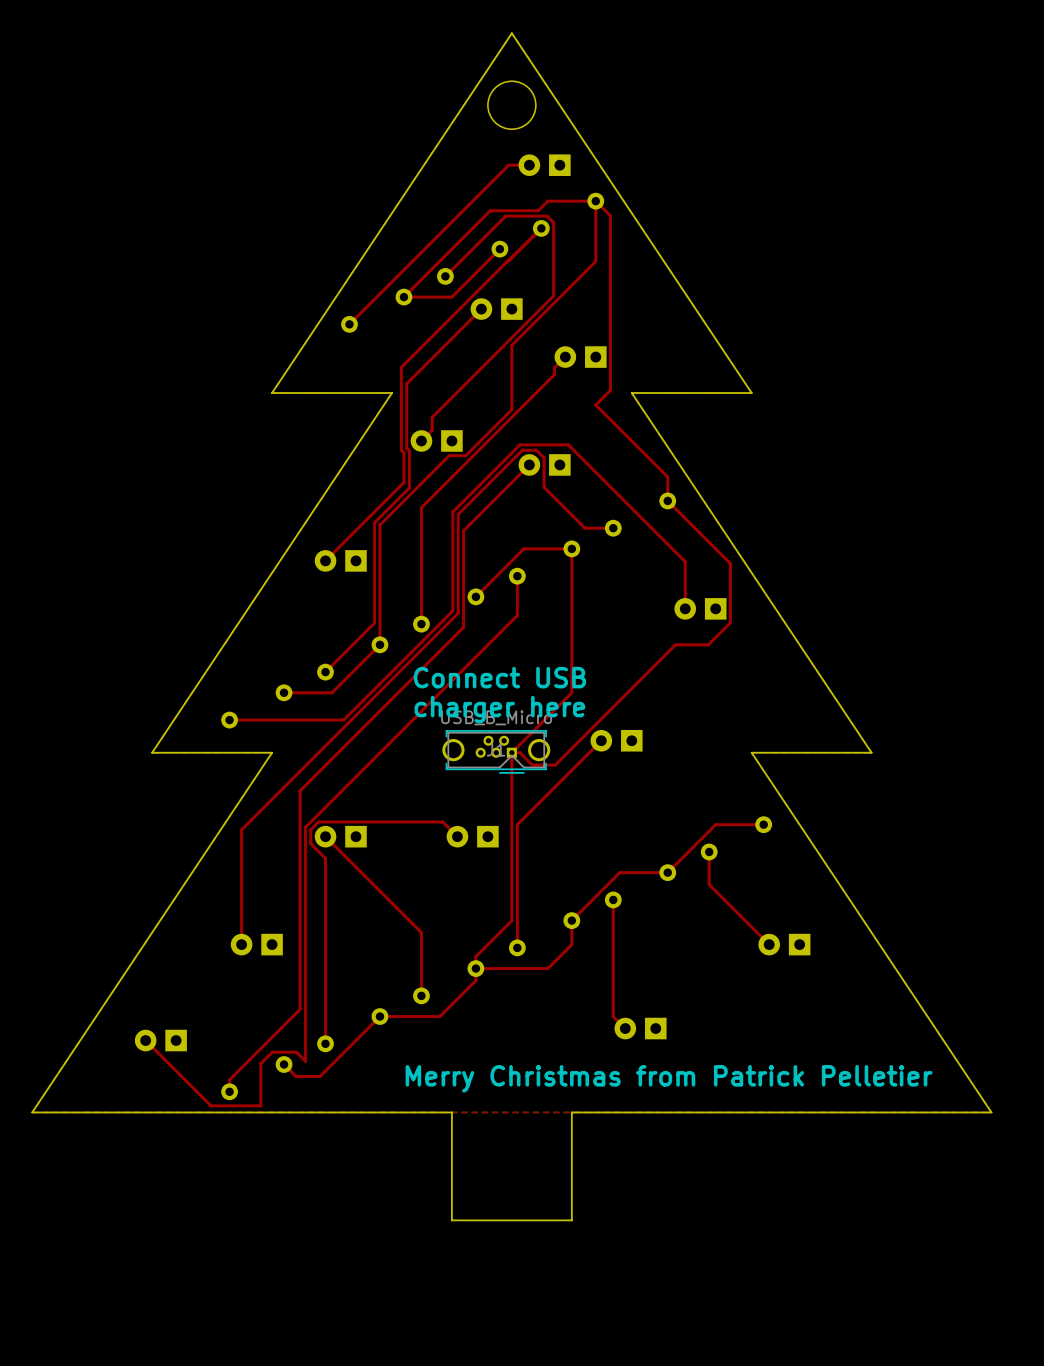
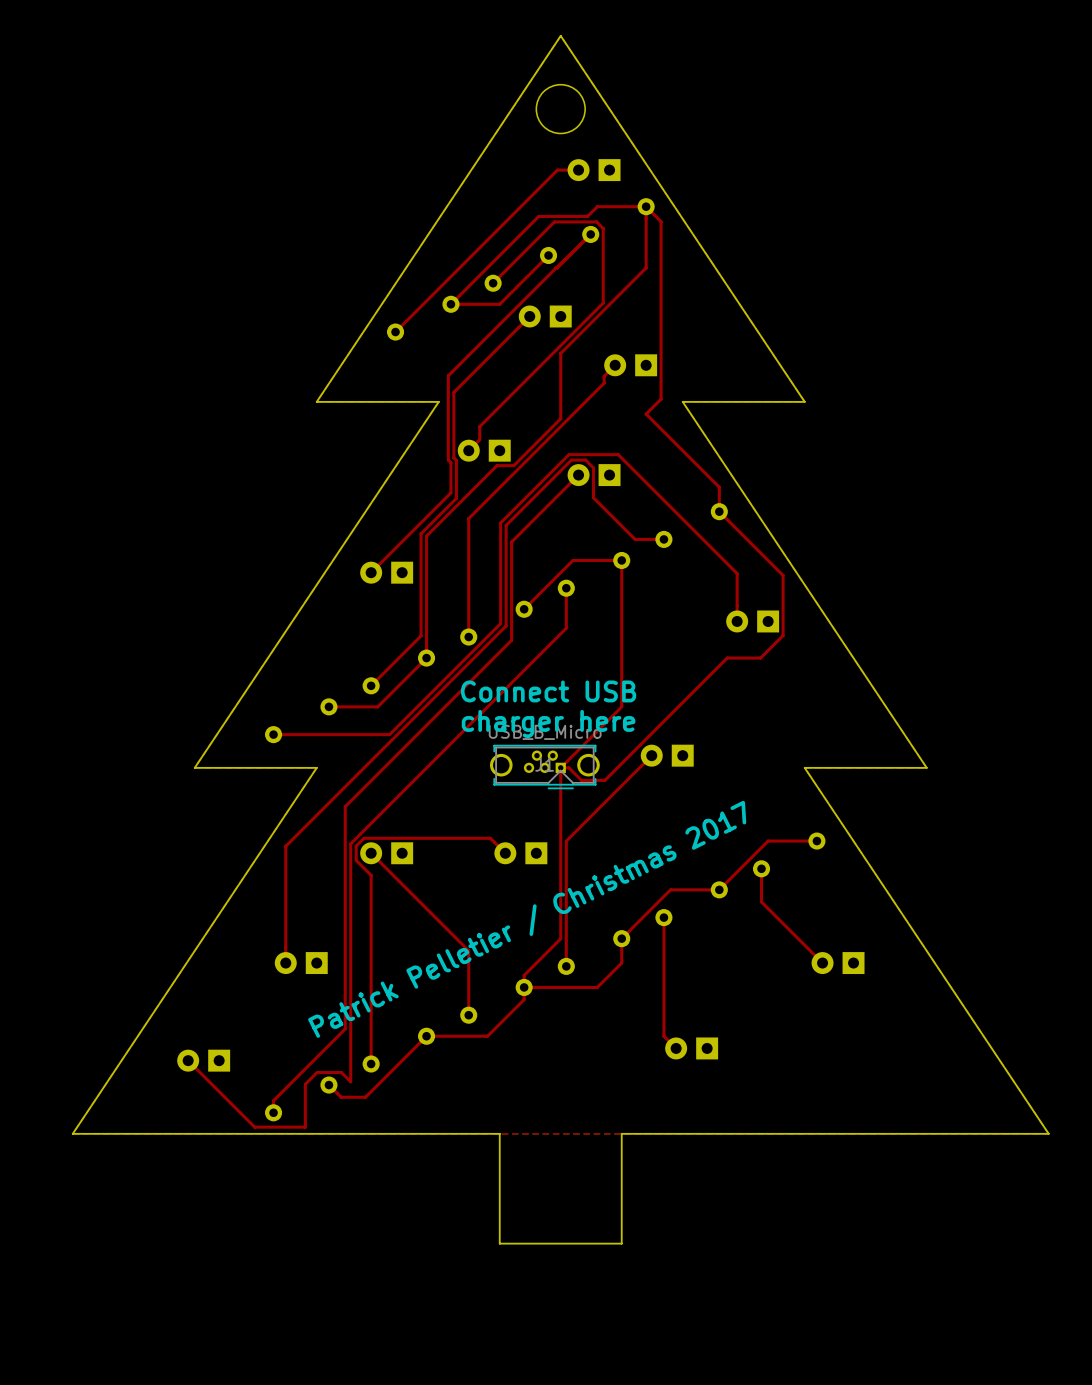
text: none -> Patrick Pelletier / Christmas 2017 (527, 919)
text: Merry Christmas from Patrick Pelletier (669, 1078) -> none

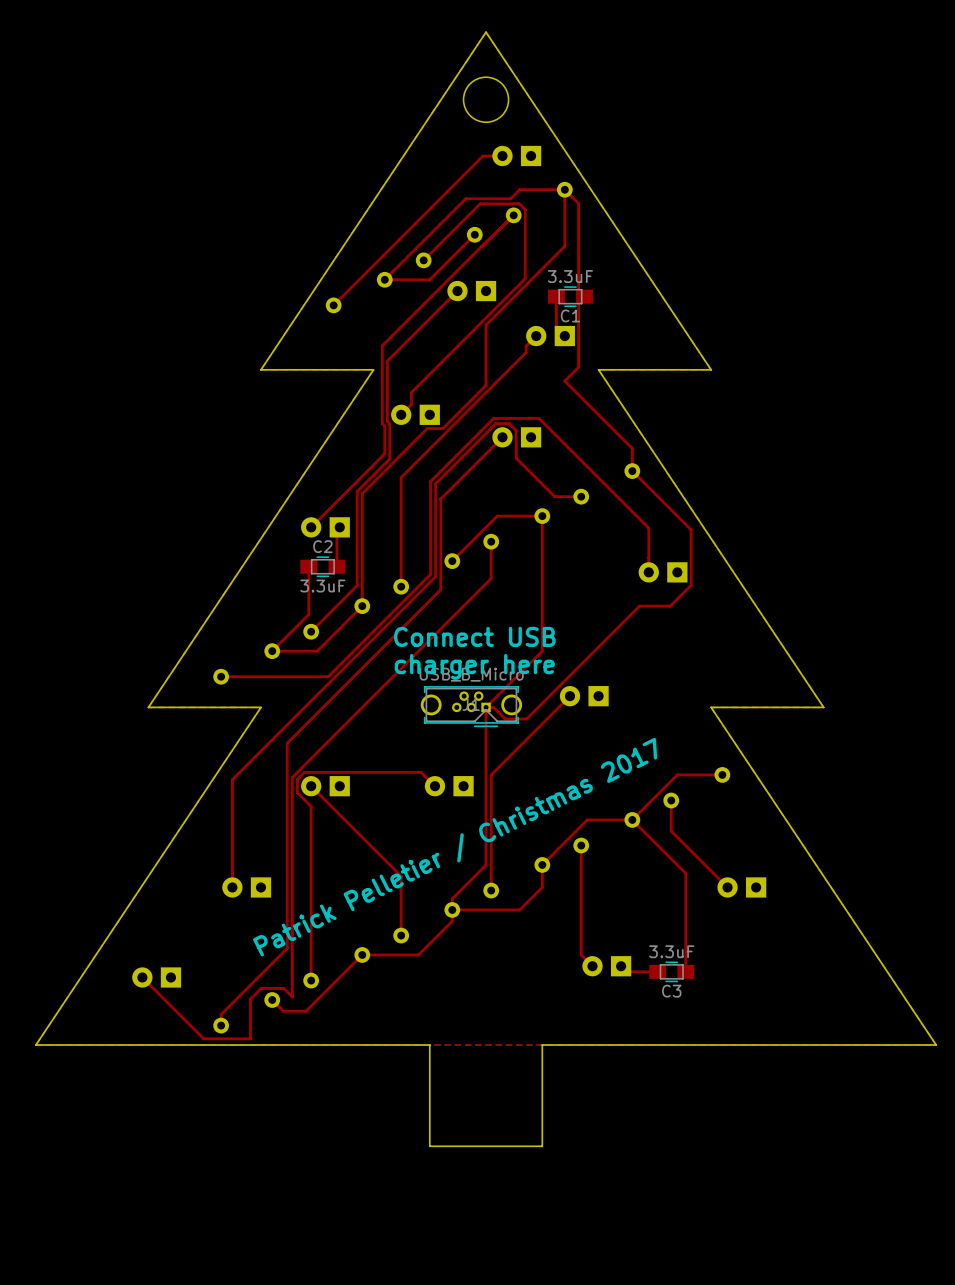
top track: none -> (556, 296) (556, 327) (564, 336)
C1: none -> 3.3uF (570, 296)
top track: none -> (339, 527) (336, 530) (336, 566)
top track: none -> (308, 566) (308, 614) (272, 651)
C2: none -> 3.3uF (322, 566)
top track: none -> (632, 819) (685, 873) (685, 971)
top track: none -> (621, 966) (626, 971) (657, 971)
C3: none -> 3.3uF (671, 971)

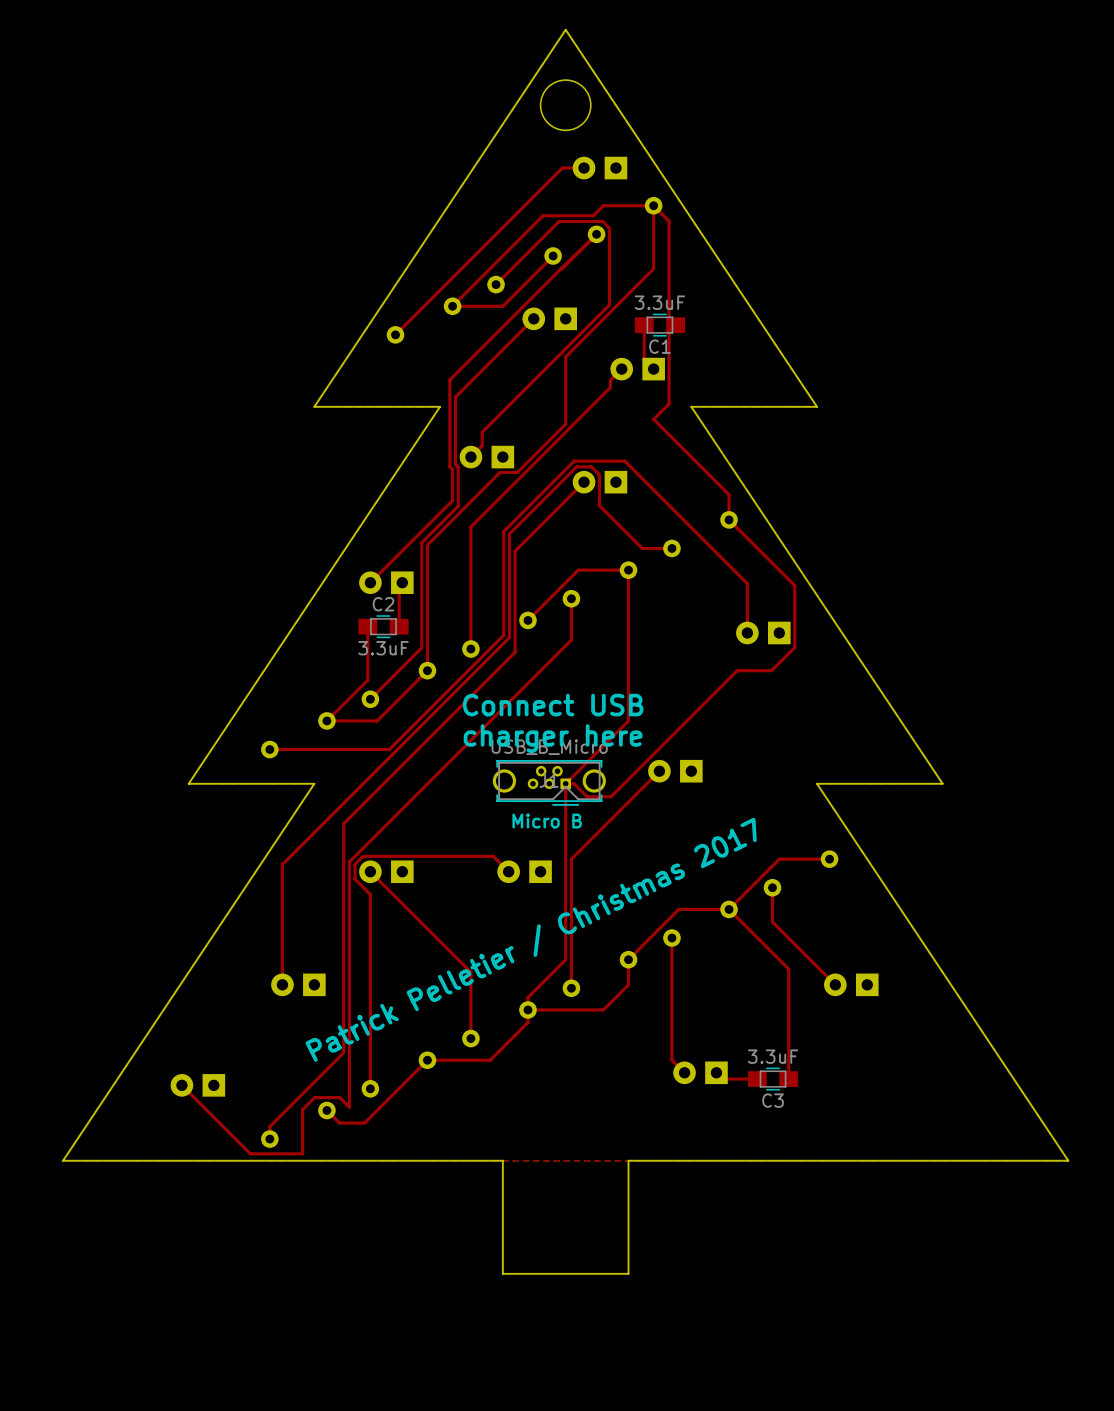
text: none -> Micro B (547, 821)

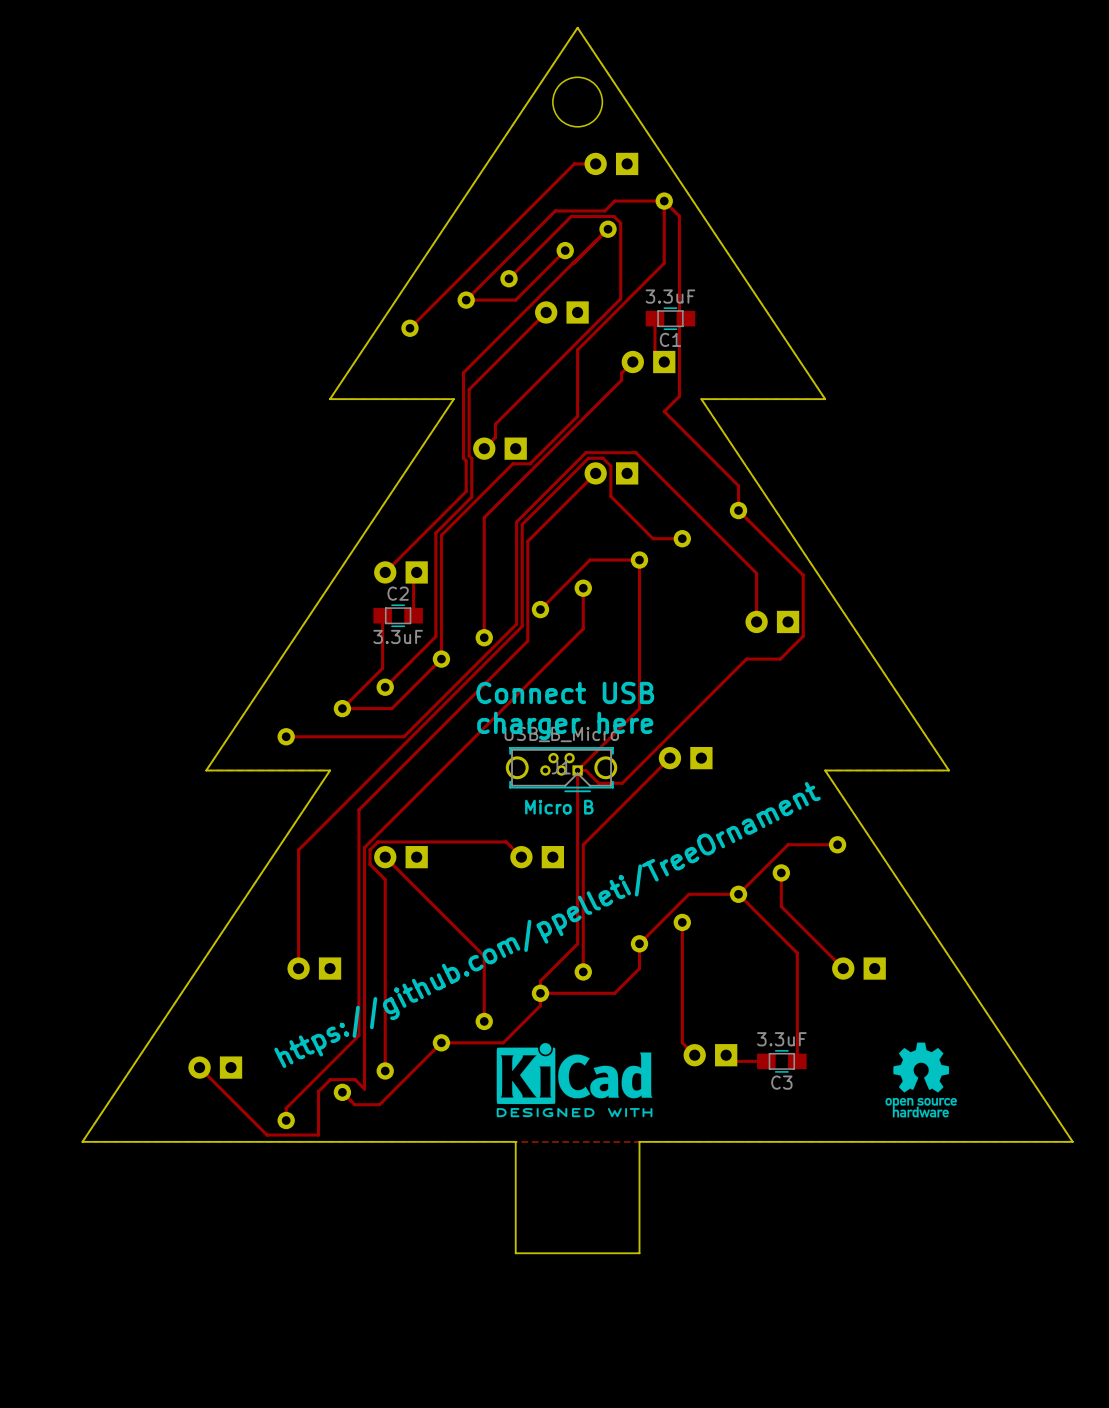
text: Patrick Pelletier / Christmas 2017 (531, 939) -> https://github.com/ppelleti/TreeOrnament (547, 925)
drawing: none -> [496, 1043, 653, 1118]
drawing: none -> [885, 1042, 957, 1118]

